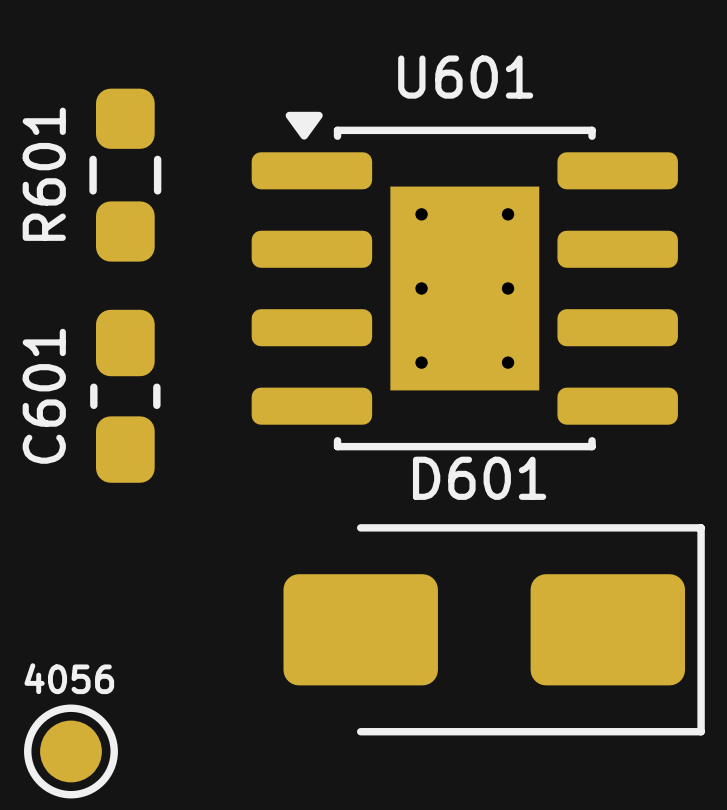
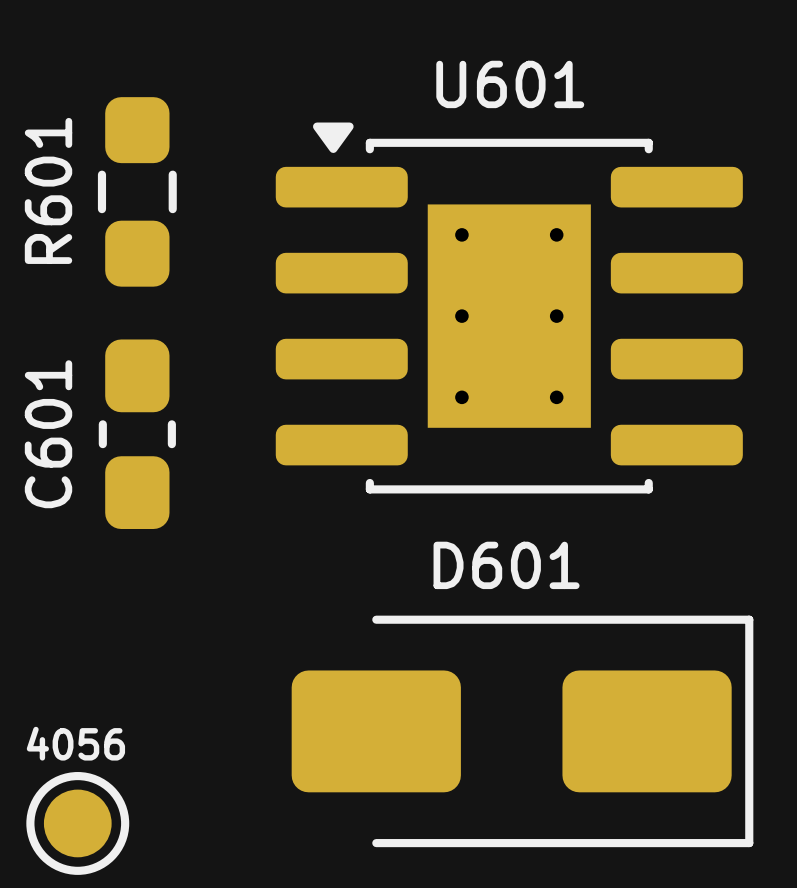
D601 position: (494, 629) -> (522, 731)

